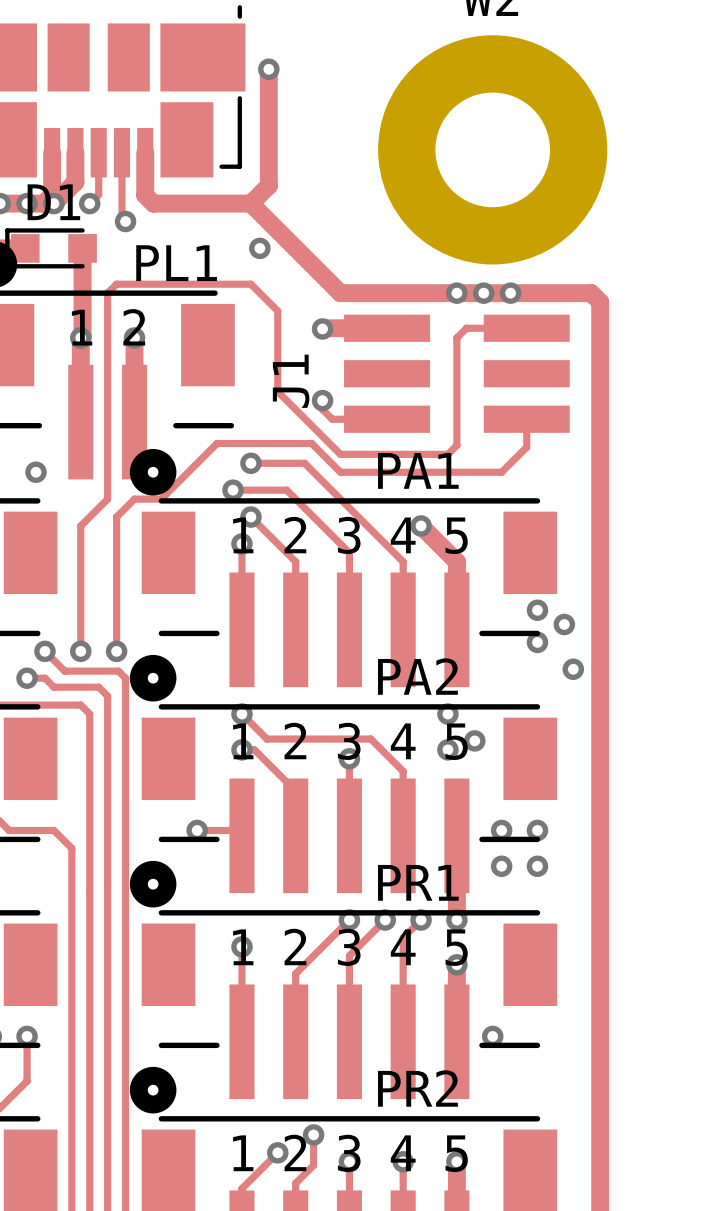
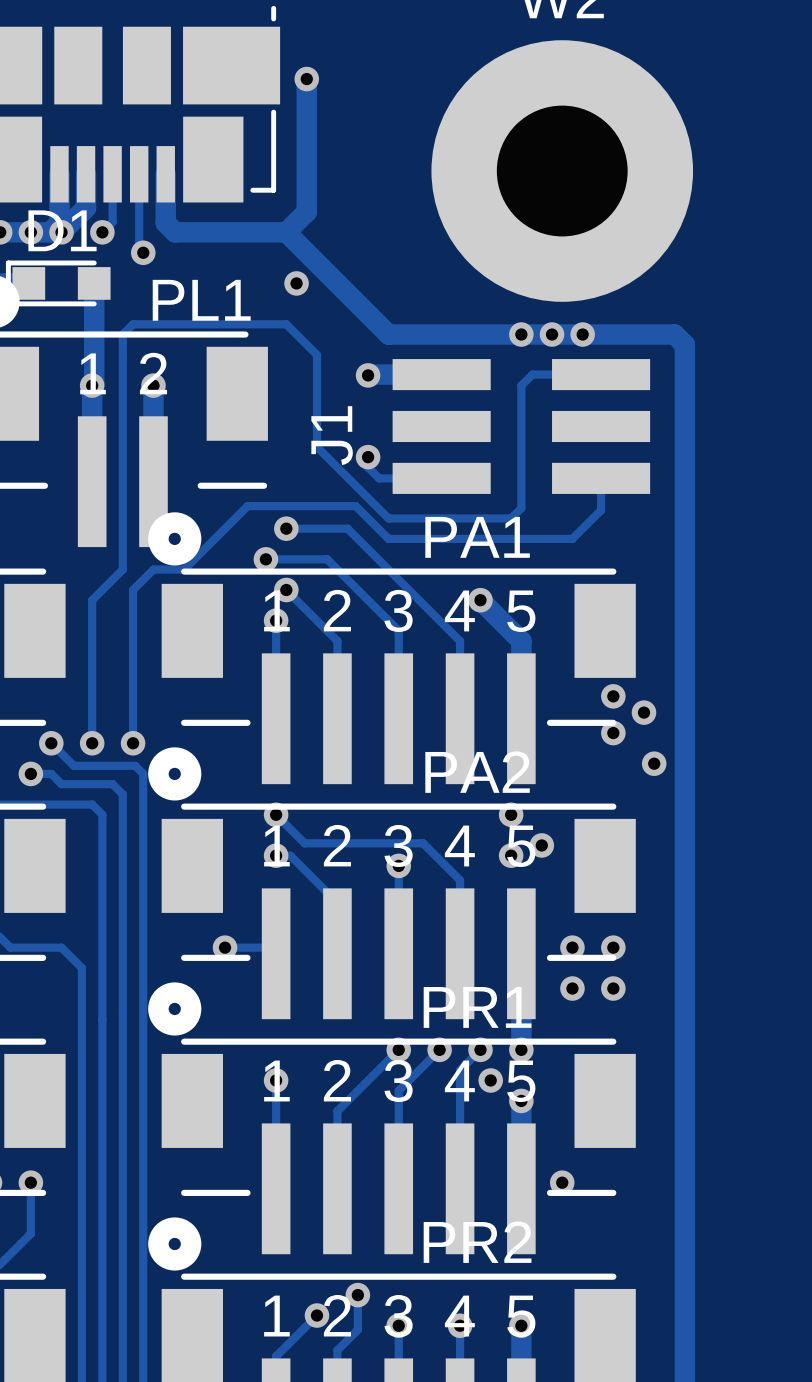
via: (36, 472) -> none
via: none -> (490, 1080)

